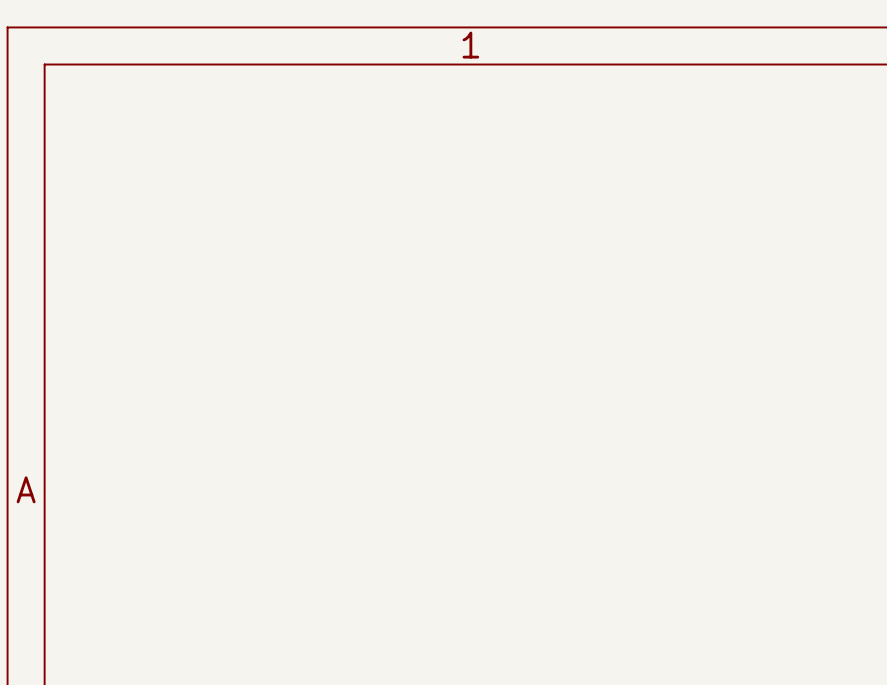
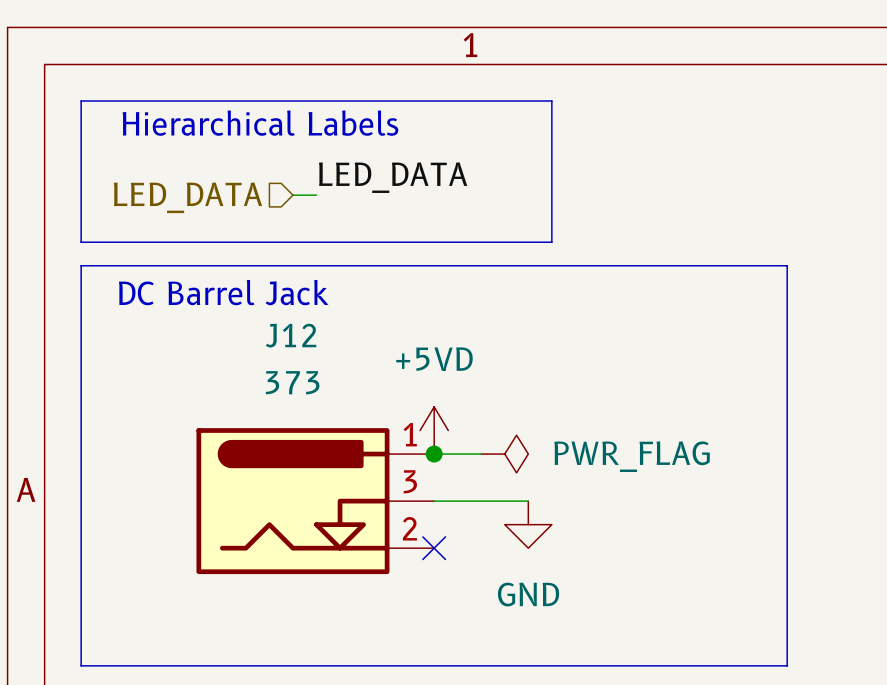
line: none -> (81, 101) (551, 101) (551, 242) (81, 242) (81, 101)
text: none -> Hierarchical Labels (260, 123)
label: none -> LED_DATA (393, 177)
hierarchical label: none -> LED_DATA (187, 197)
wire: none -> (292, 195) (316, 195)
line: none -> (81, 265) (81, 665) (787, 665) (787, 265) (81, 265)
text: none -> DC Barrel Jack (223, 292)
power symbol: none -> +5VD (434, 430)
wire: none -> (434, 454) (481, 454)
junction: none -> (434, 454)
power symbol: none -> PWR_FLAG (504, 454)
J12: none -> 373 (315, 501)
wire: none -> (434, 501) (528, 501)
power symbol: none -> GND (528, 524)
no-connect mark: none -> (434, 548)

